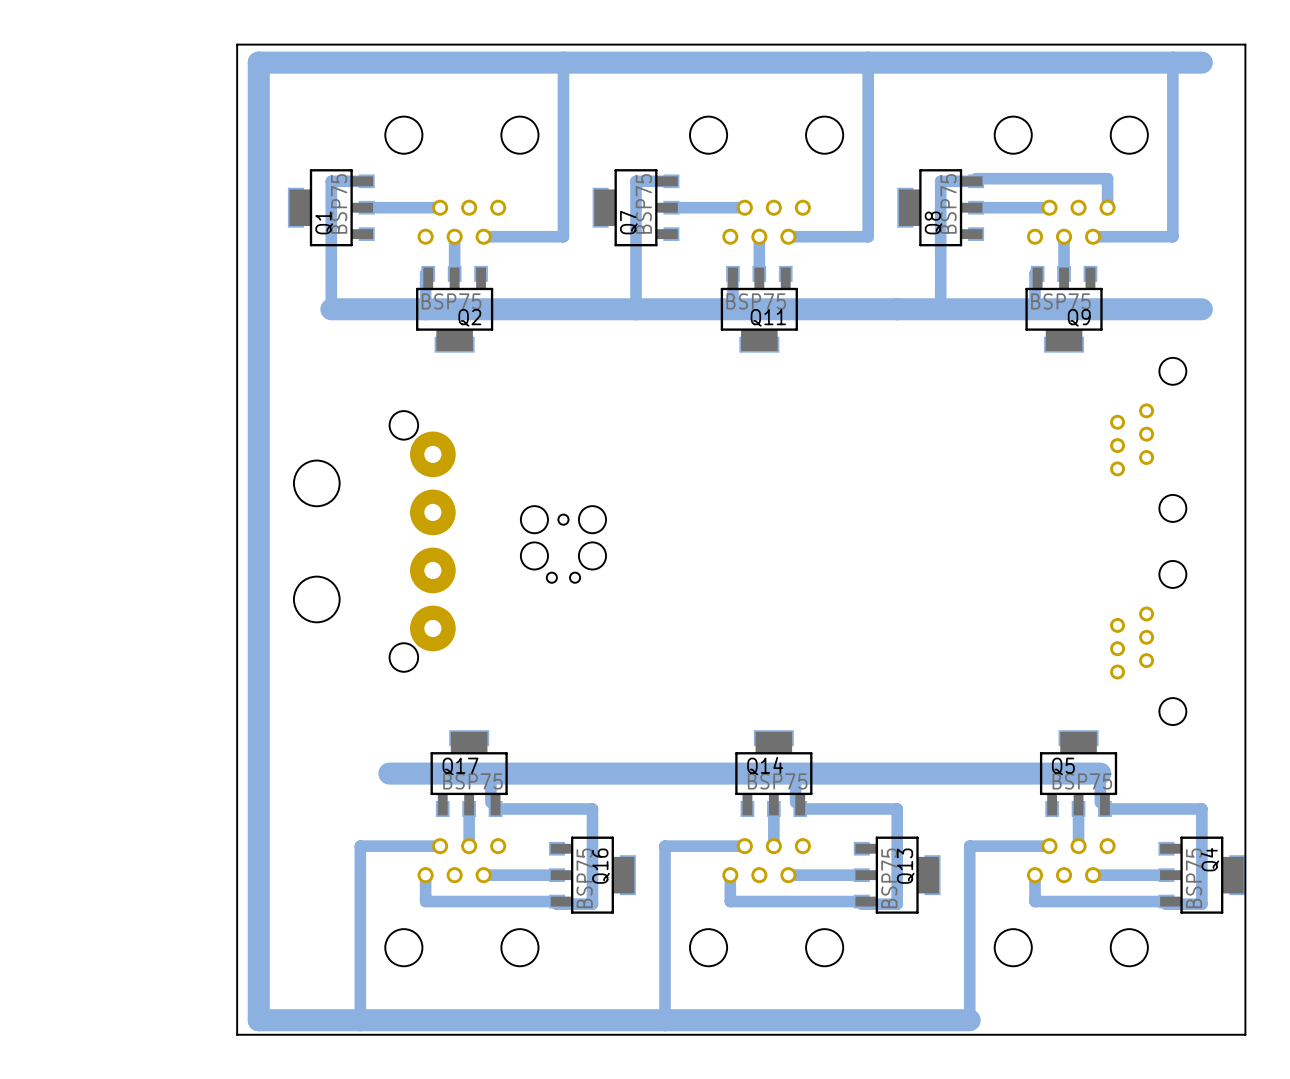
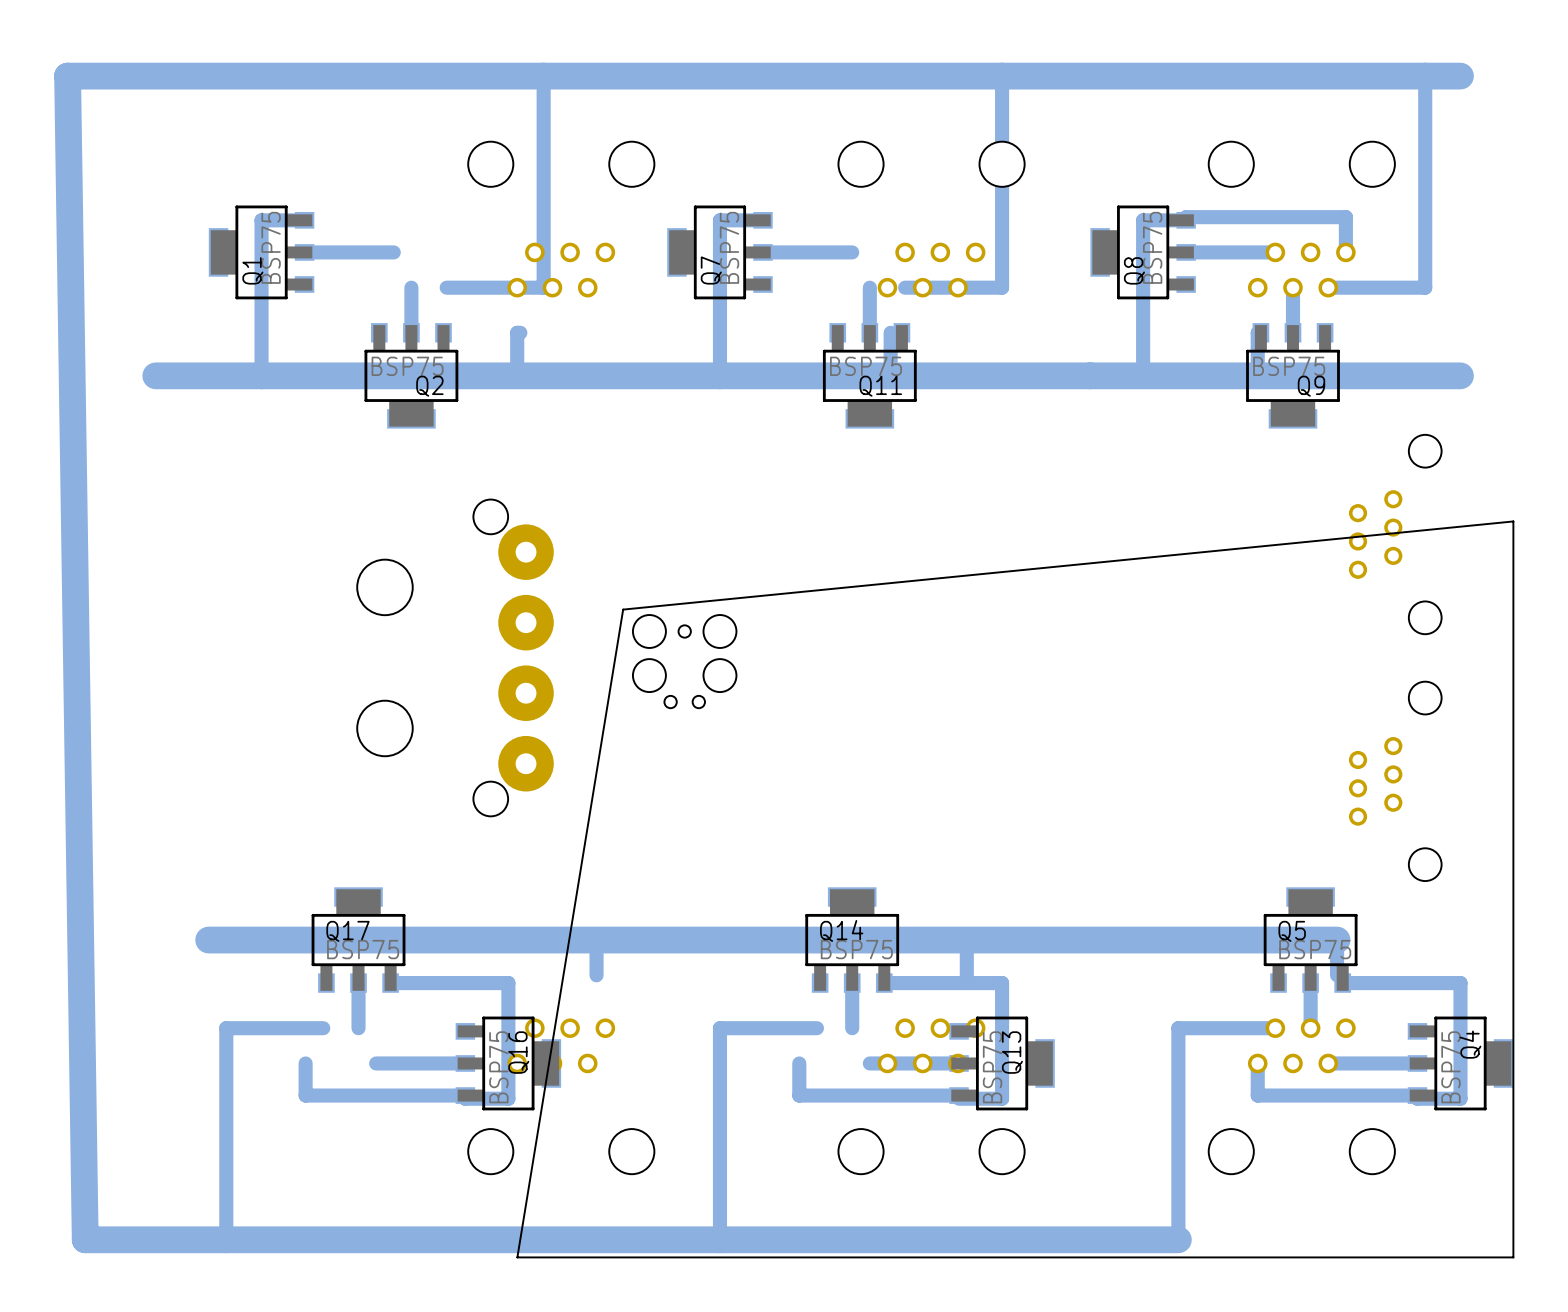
track: (258, 62) (258, 1020) -> (314, 76) (67, 76) (85, 1239) (314, 1239)
track: (563, 62) (563, 236) (483, 236) -> (543, 76) (543, 287) (446, 287)
track: (868, 62) (868, 236) (824, 236) -> (1002, 76) (1002, 287)
track: none -> (304, 220) (261, 220) (261, 375)
track: (366, 181) (331, 181) (331, 309) -> (155, 375) (402, 375)
track: (671, 181) (636, 181) (636, 309) -> (762, 220) (719, 220) (719, 375)
Q1 position: (331, 207) -> (261, 252)
track: (440, 207) (366, 207) -> (393, 252) (304, 252)
Q7 position: (636, 207) -> (719, 252)
track: none -> (815, 252) (762, 252)
track: (744, 207) (701, 207) -> (957, 287) (905, 287)
track: (454, 236) (454, 273) -> (411, 287) (411, 332)
track: (759, 236) (759, 273) -> (869, 287) (869, 332)
Q2 position: (454, 309) -> (411, 375)
Q11 position: (759, 309) -> (869, 375)
board edge: (1245, 429) (1245, 44) (237, 44) (237, 1034) (425, 1034) -> (1513, 521) (623, 609) (517, 1257)
track: none -> (473, 940) (208, 940)
Q17 position: (469, 773) -> (358, 940)
Q14 position: (773, 773) -> (852, 940)
track: none -> (390, 983) (508, 983) (508, 1098) (465, 1098) (465, 1095) (305, 1095) (305, 1063)
track: (469, 808) (469, 846) -> (358, 983) (358, 1028)
track: (495, 808) (592, 808) (592, 846) -> (808, 1028) (719, 1028)
track: (773, 808) (773, 846) -> (852, 983) (852, 1028)
track: (824, 808) (897, 808) (897, 904) (861, 904) (861, 901) (789, 901) -> (1002, 983) (1002, 1098) (959, 1098) (959, 1095)
track: (440, 846) (360, 846) (360, 1020) -> (323, 1028) (226, 1028) (226, 1239)
track: (665, 846) (665, 1020) -> none
track: (744, 846) (672, 846) -> (957, 1063) (869, 1063)
track: (425, 875) (425, 901) (557, 901) (557, 904) (592, 904) -> (719, 1239) (719, 1098)
track: (557, 875) (483, 875) -> (465, 1063) (376, 1063)
Q16 position: (592, 875) -> (508, 1063)
track: (730, 875) (730, 901) -> (799, 1063) (799, 1095) (887, 1095)
track: (861, 875) (789, 875) -> (972, 983) (884, 983)
Q13 position: (897, 875) -> (1002, 1063)

